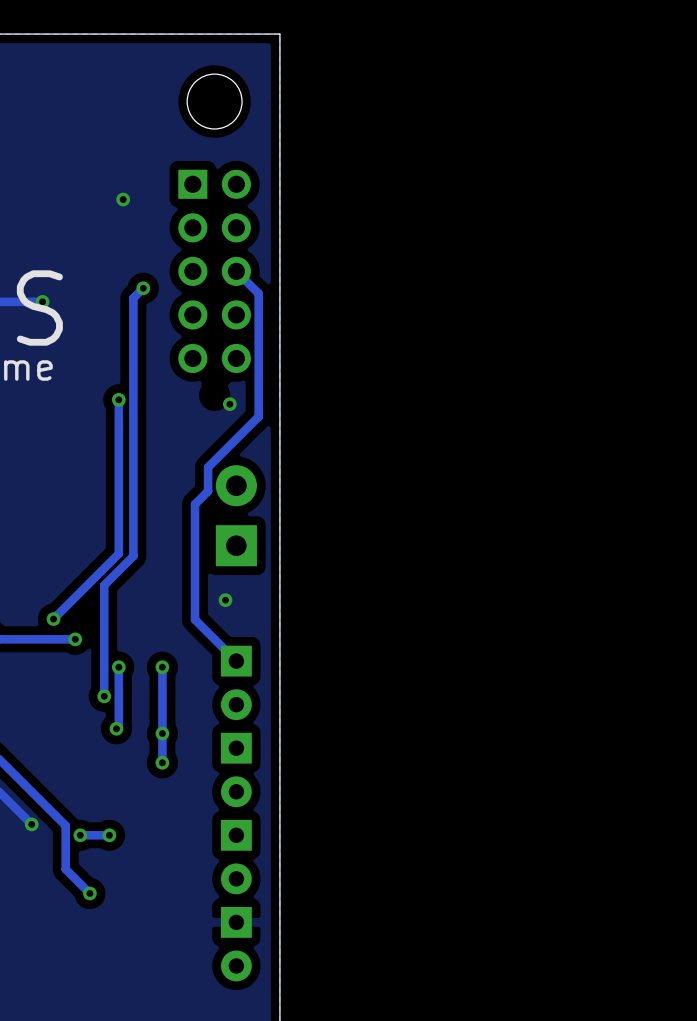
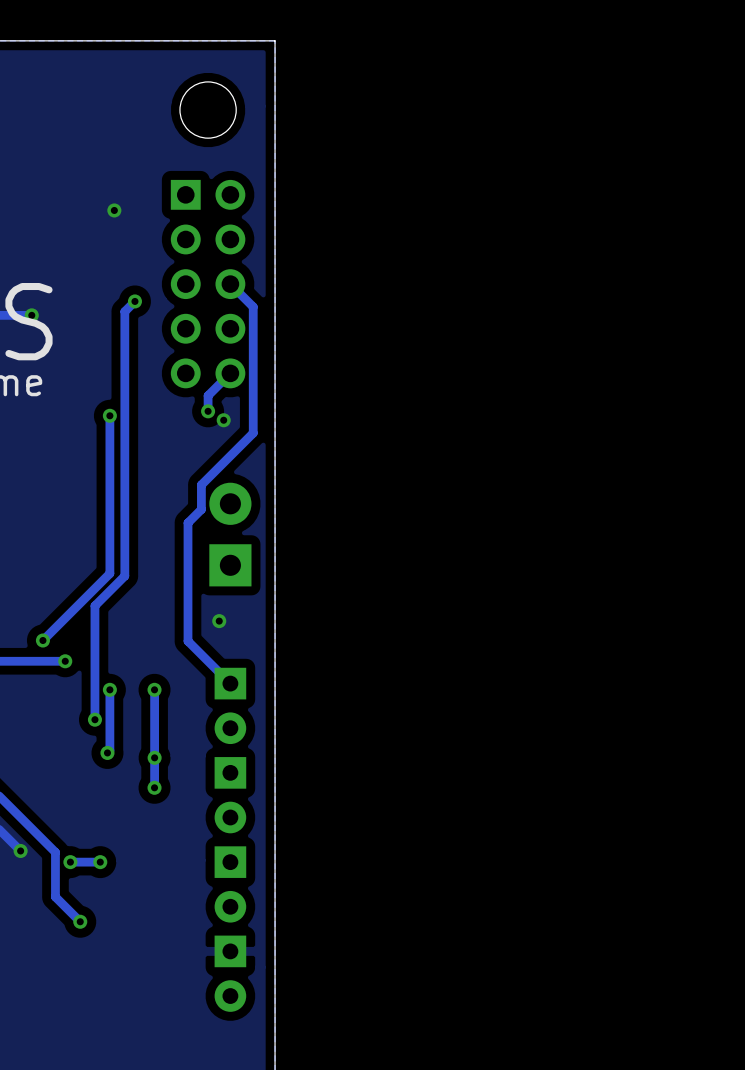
track: none -> (230, 373) (208, 395) (208, 411)
via: none -> (208, 411)

